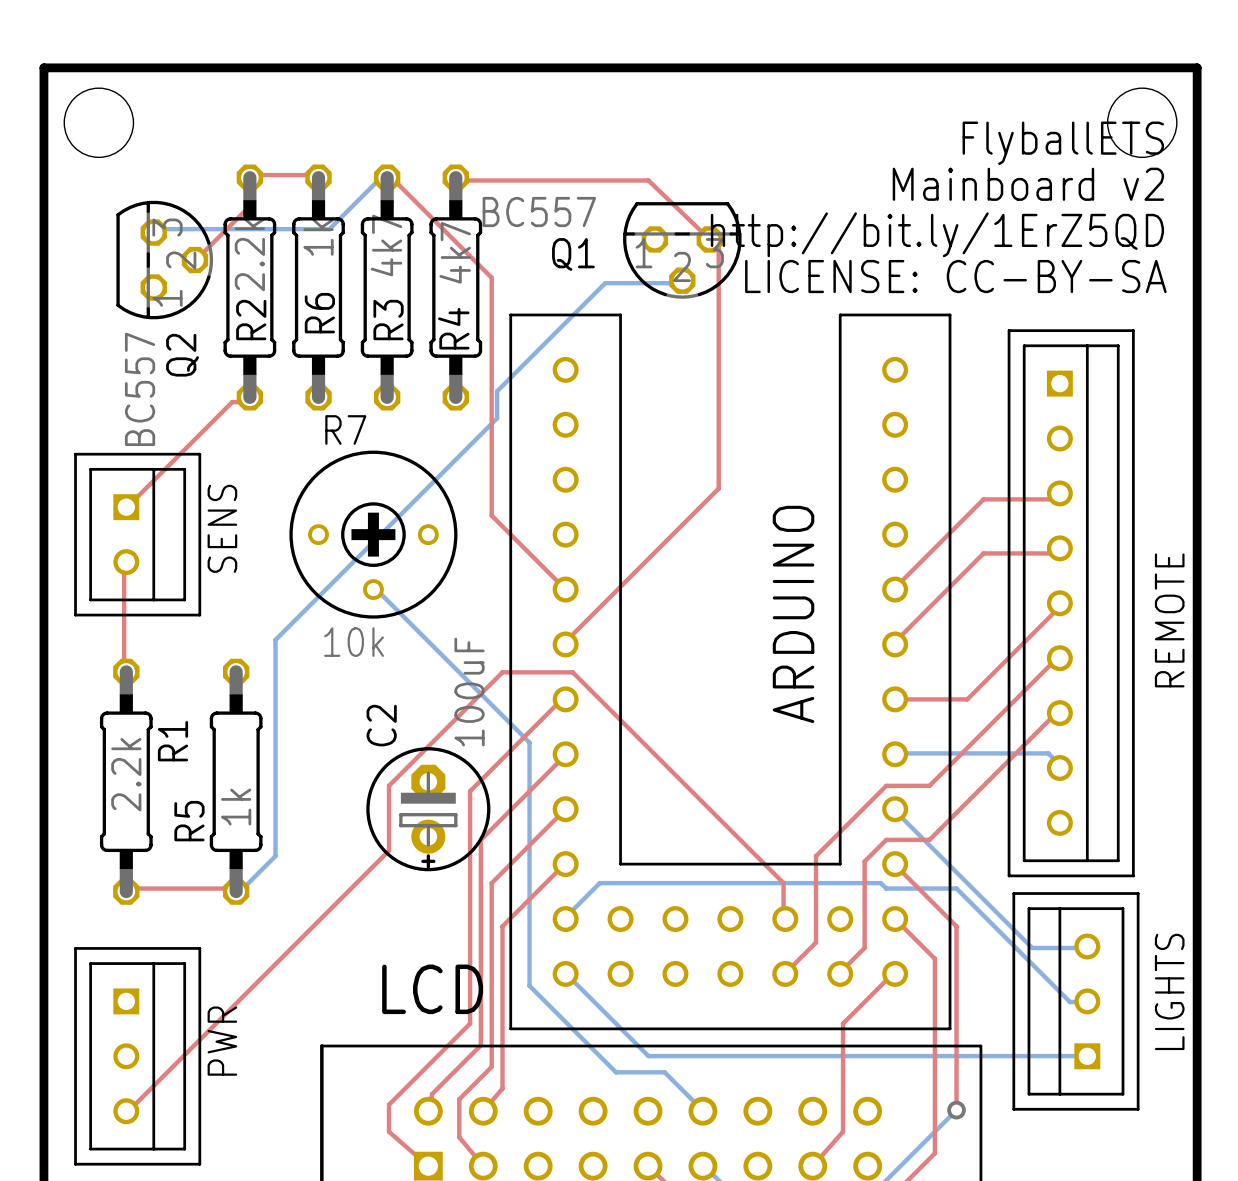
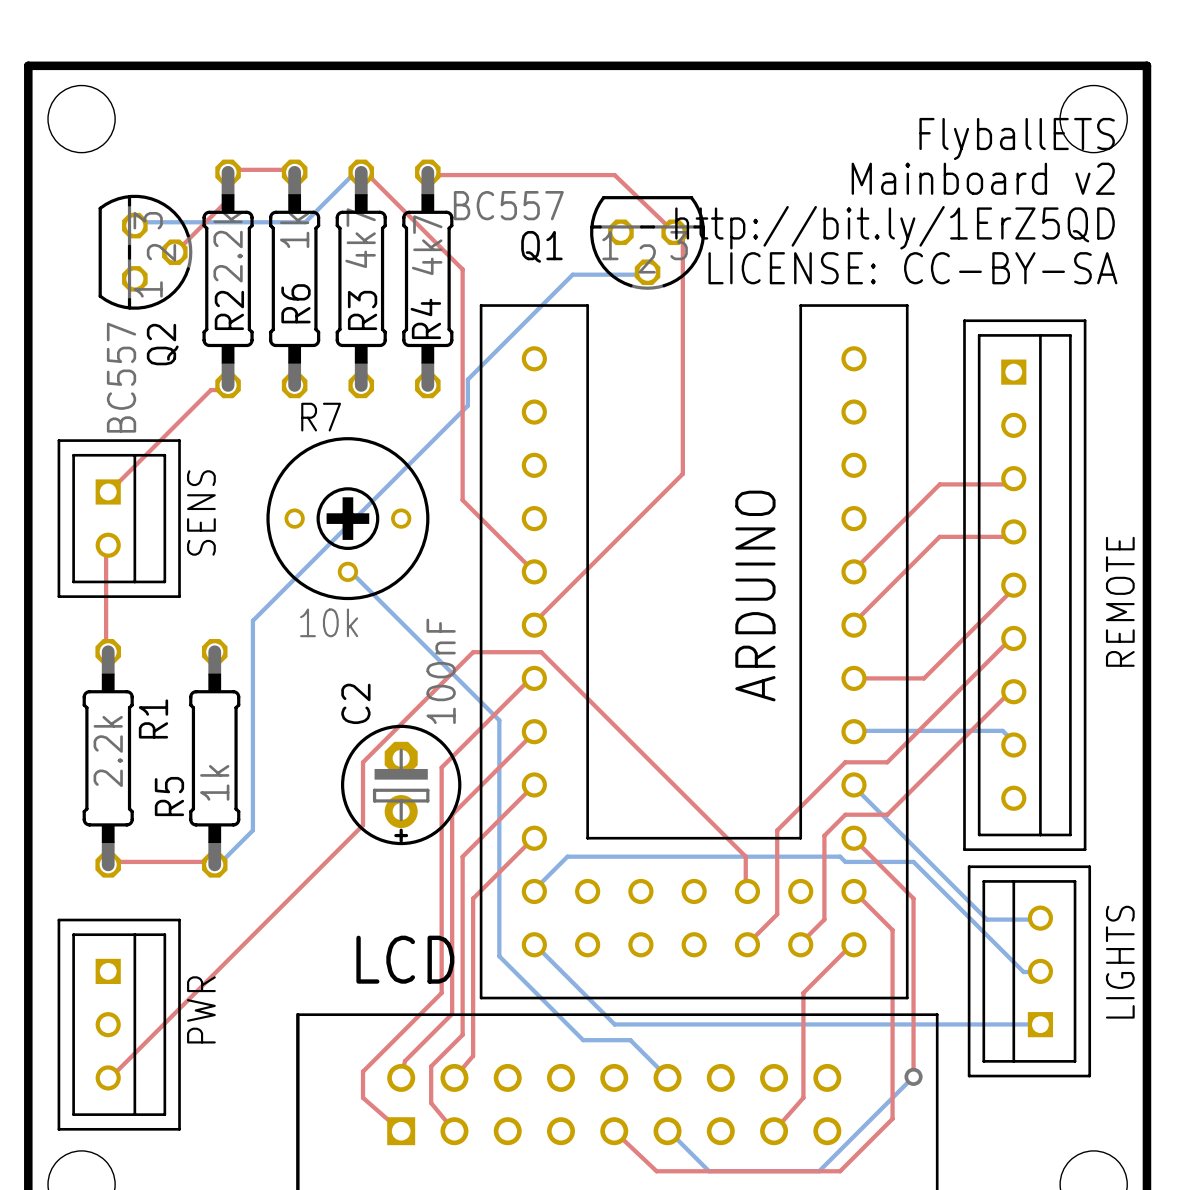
C2 value: 100uF (469, 692) -> 100nF (441, 671)

